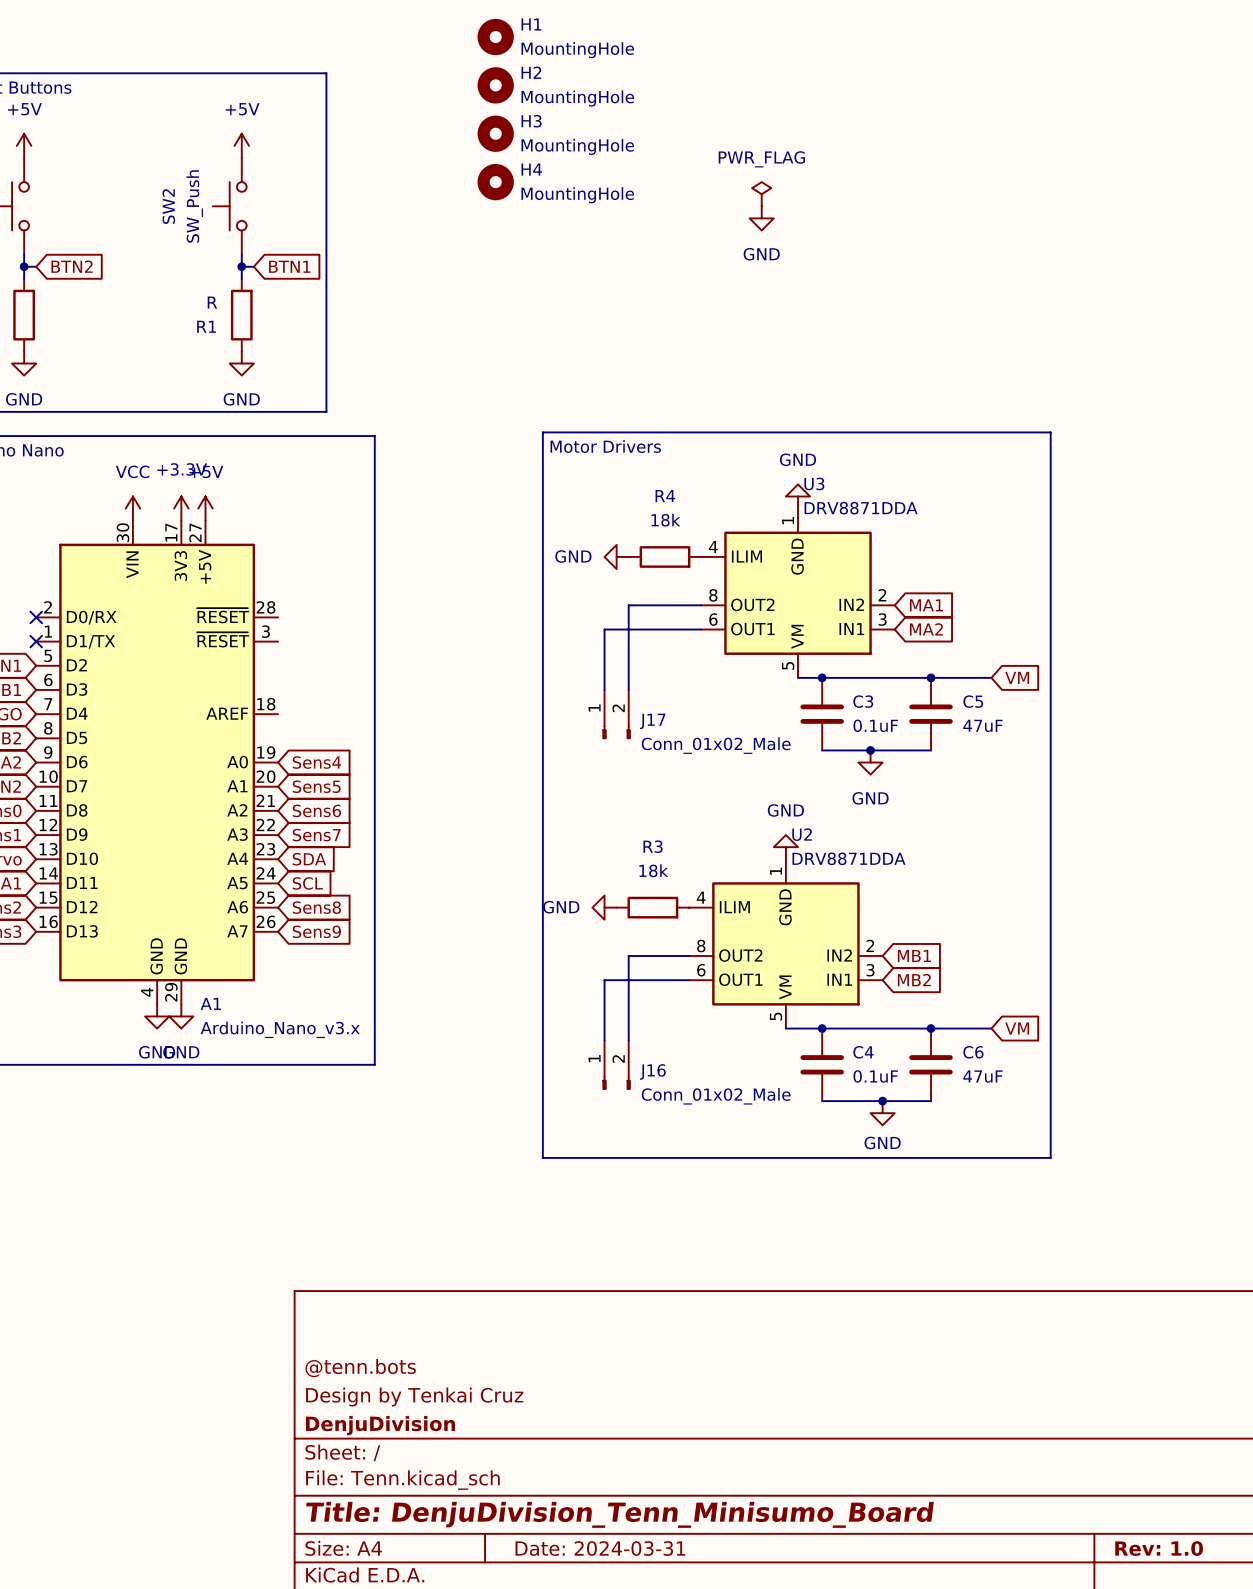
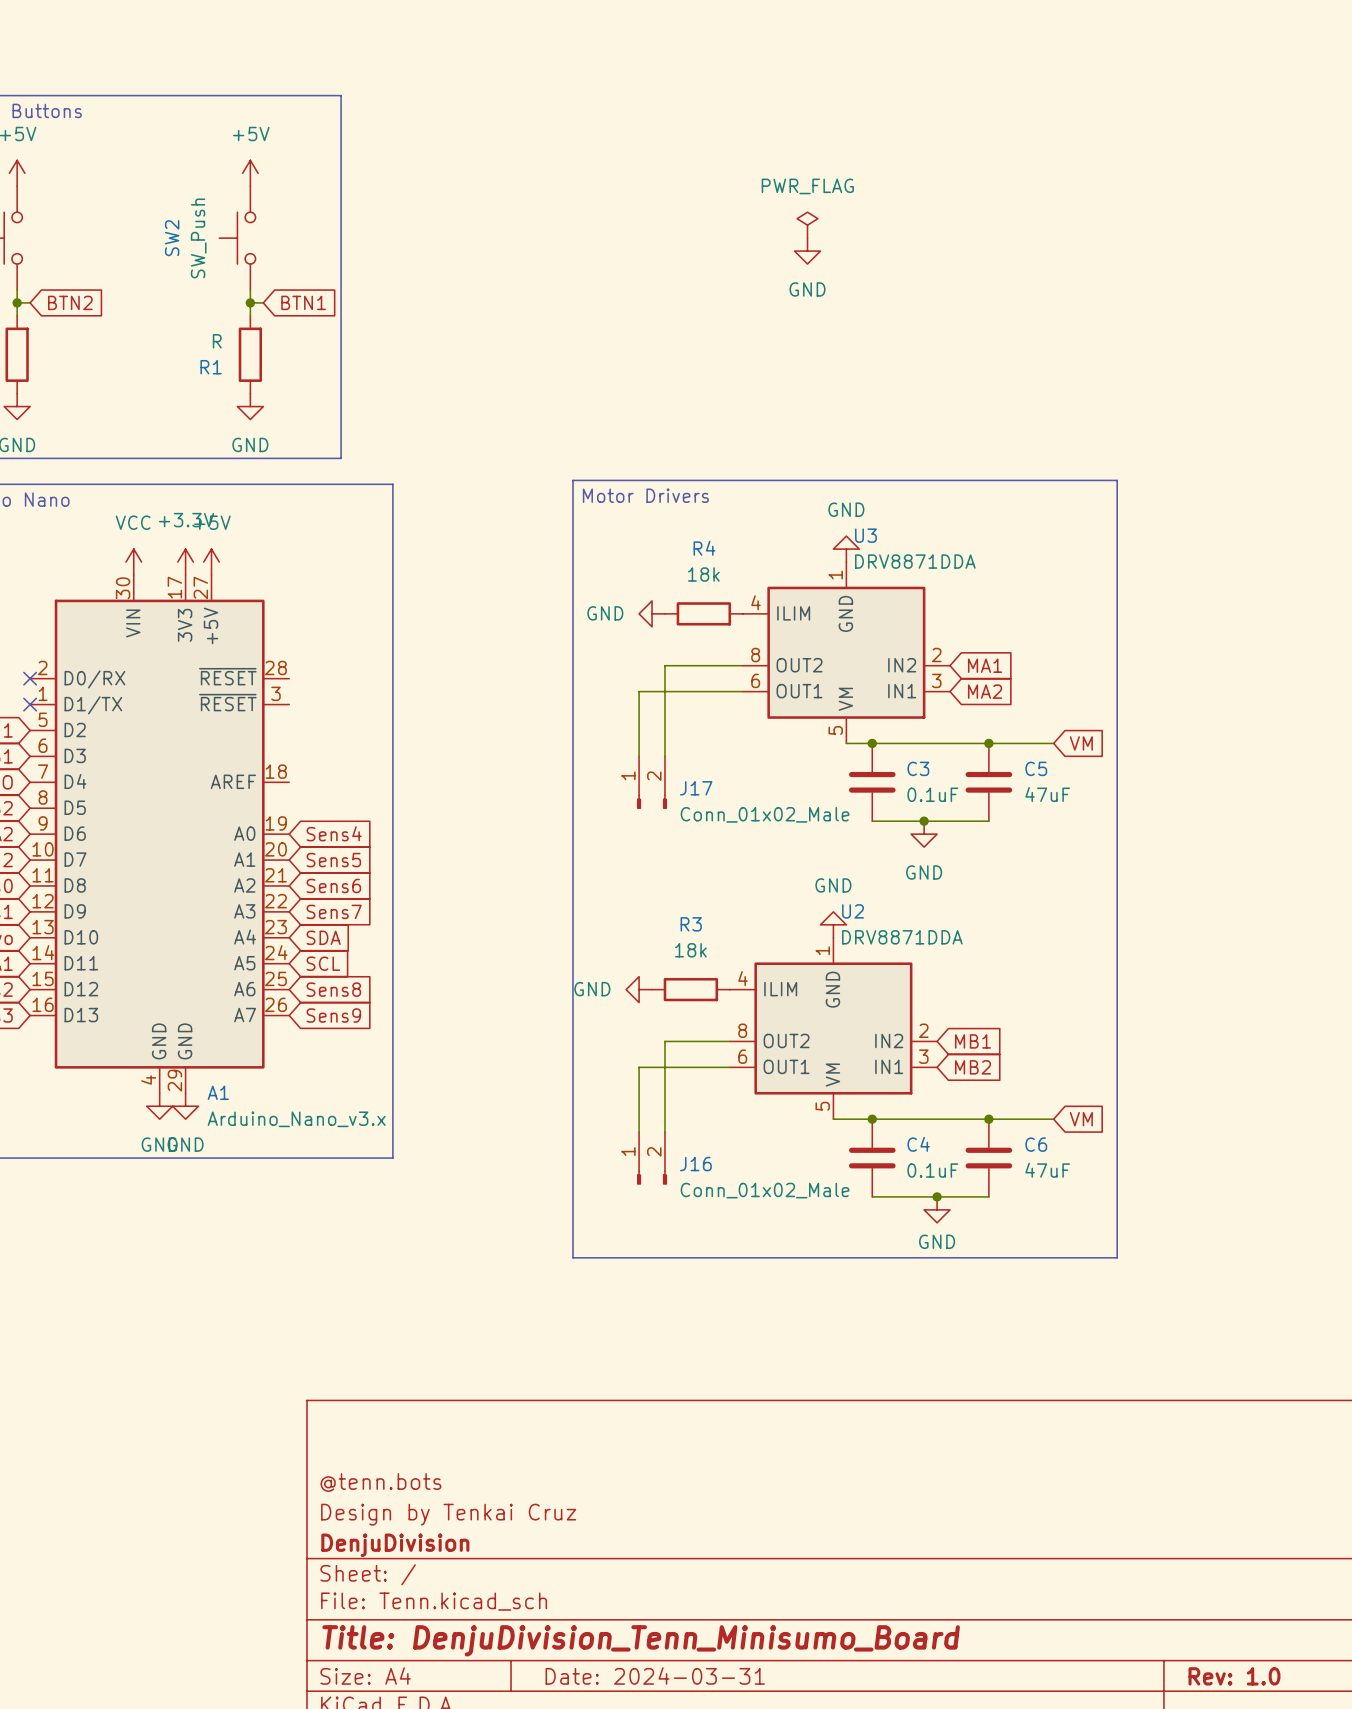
H1: MountingHole (495, 37) -> none
H2: MountingHole (495, 85) -> none
H3: MountingHole (495, 133) -> none
H4: MountingHole (495, 182) -> none

